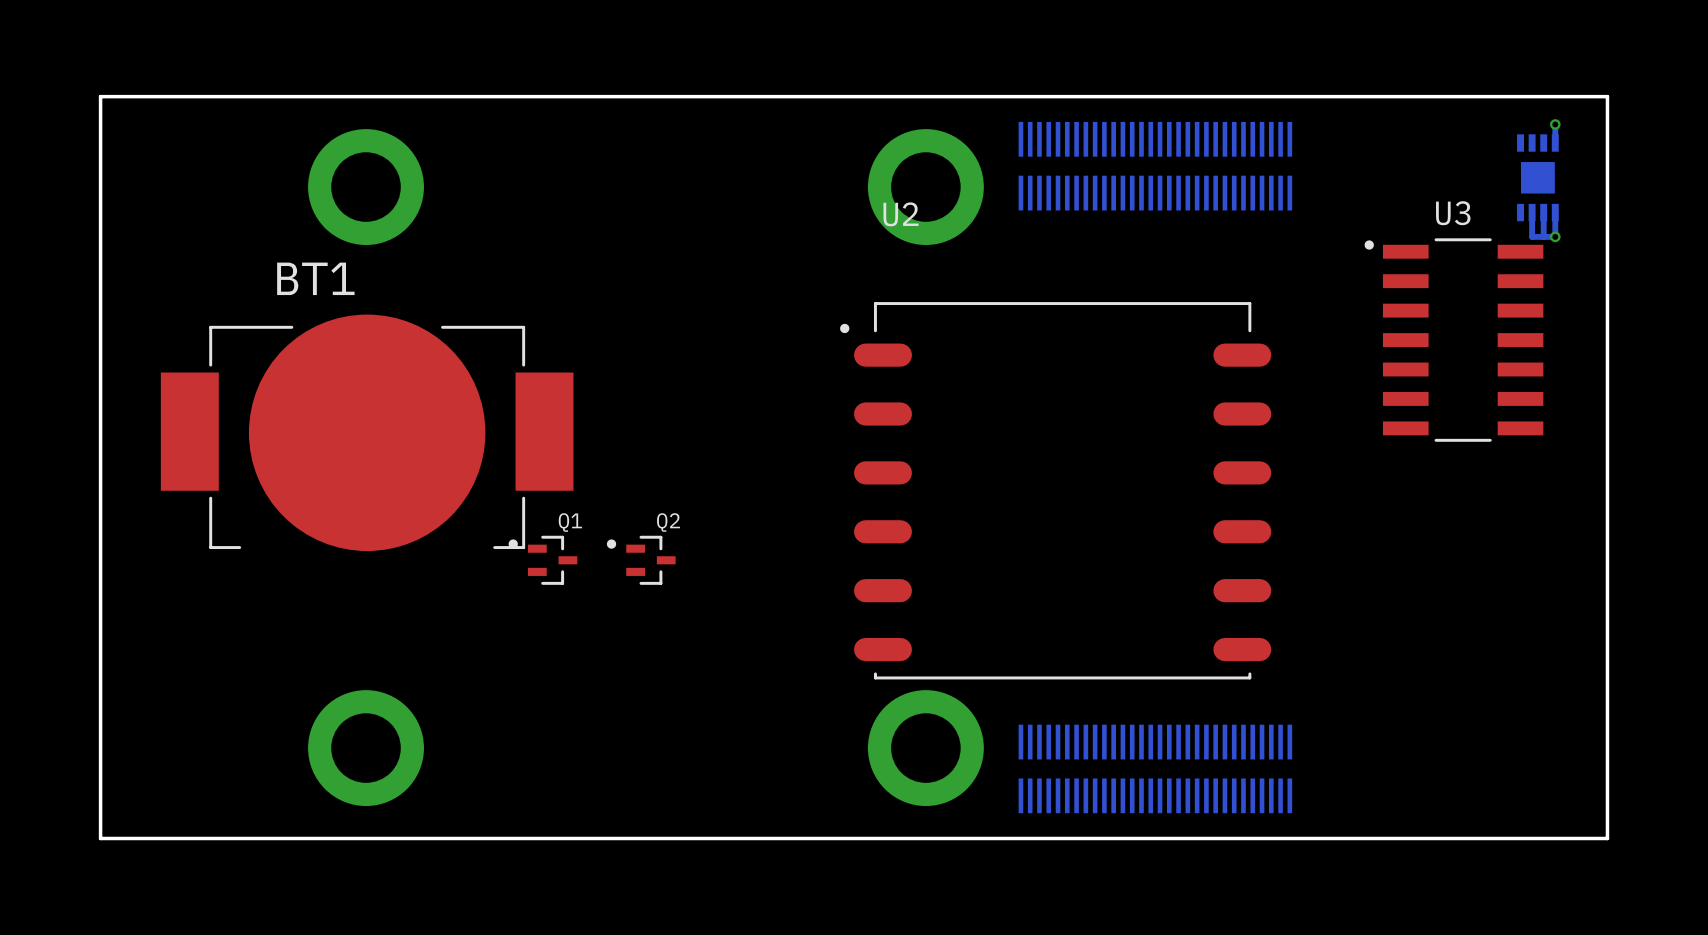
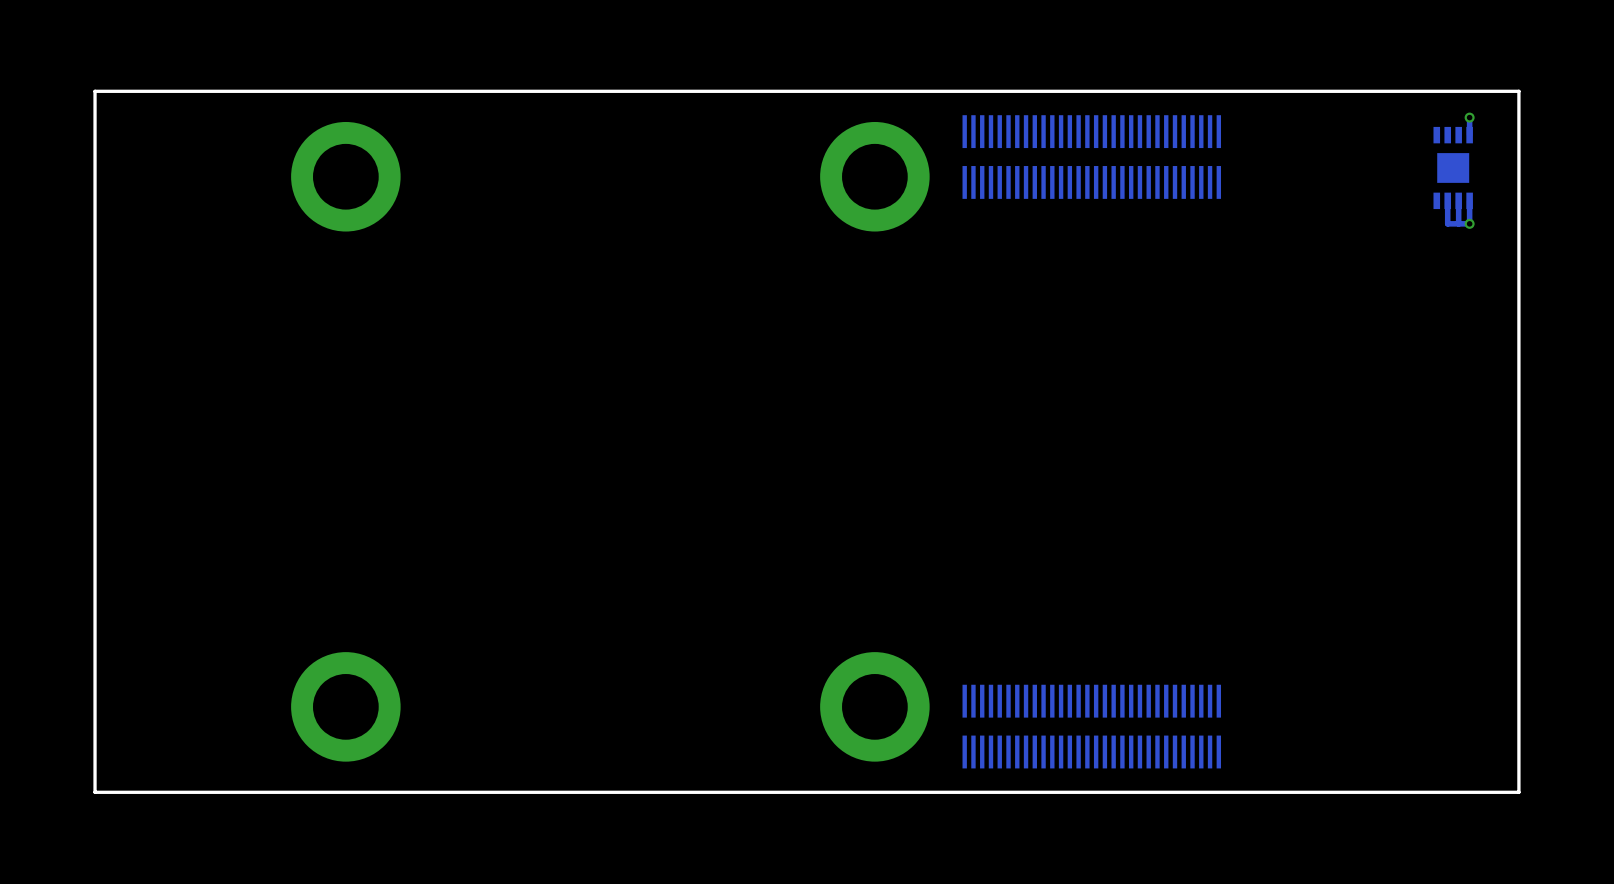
U3: (1453, 340) -> none
BT1: (367, 432) -> none
U2: (1055, 490) -> none
Q1: (542, 560) -> none
Q2: (641, 560) -> none

